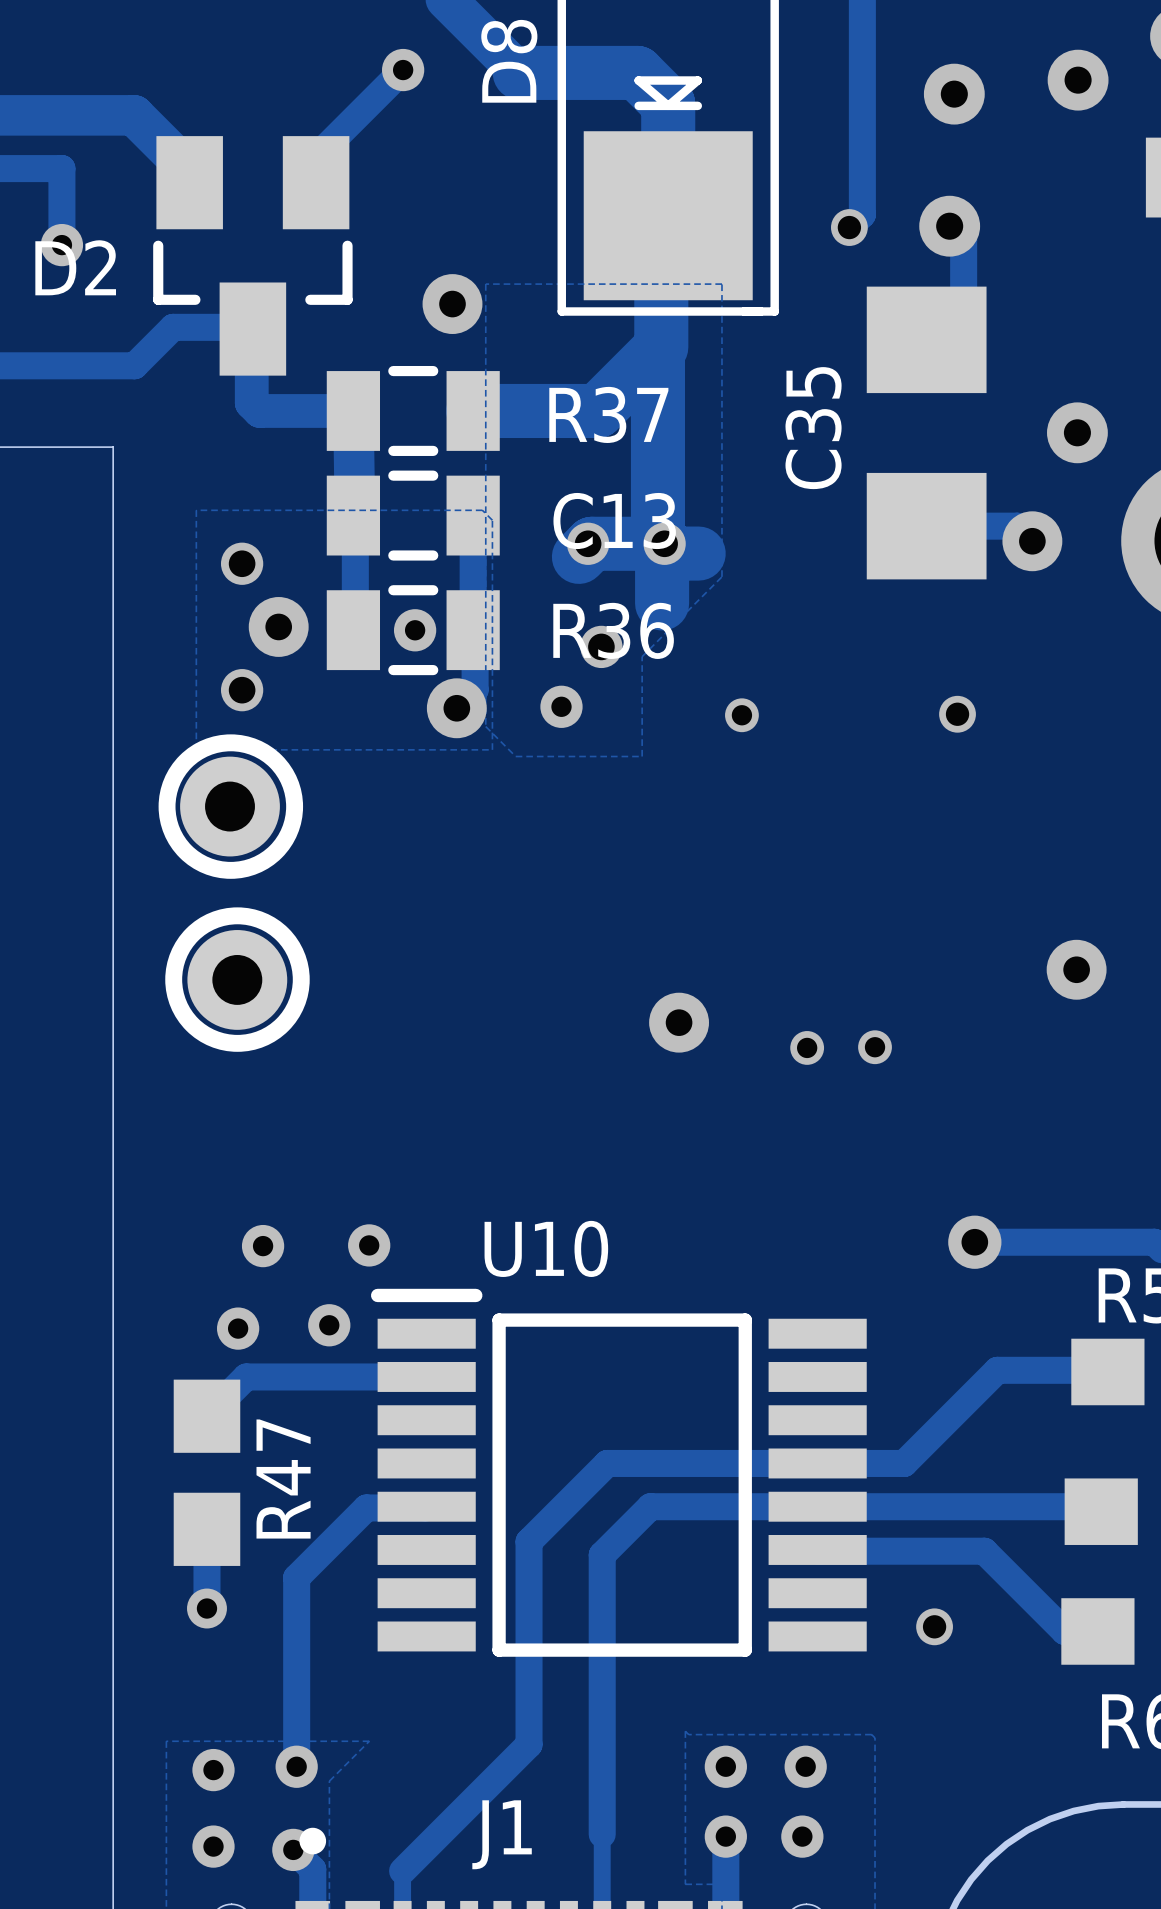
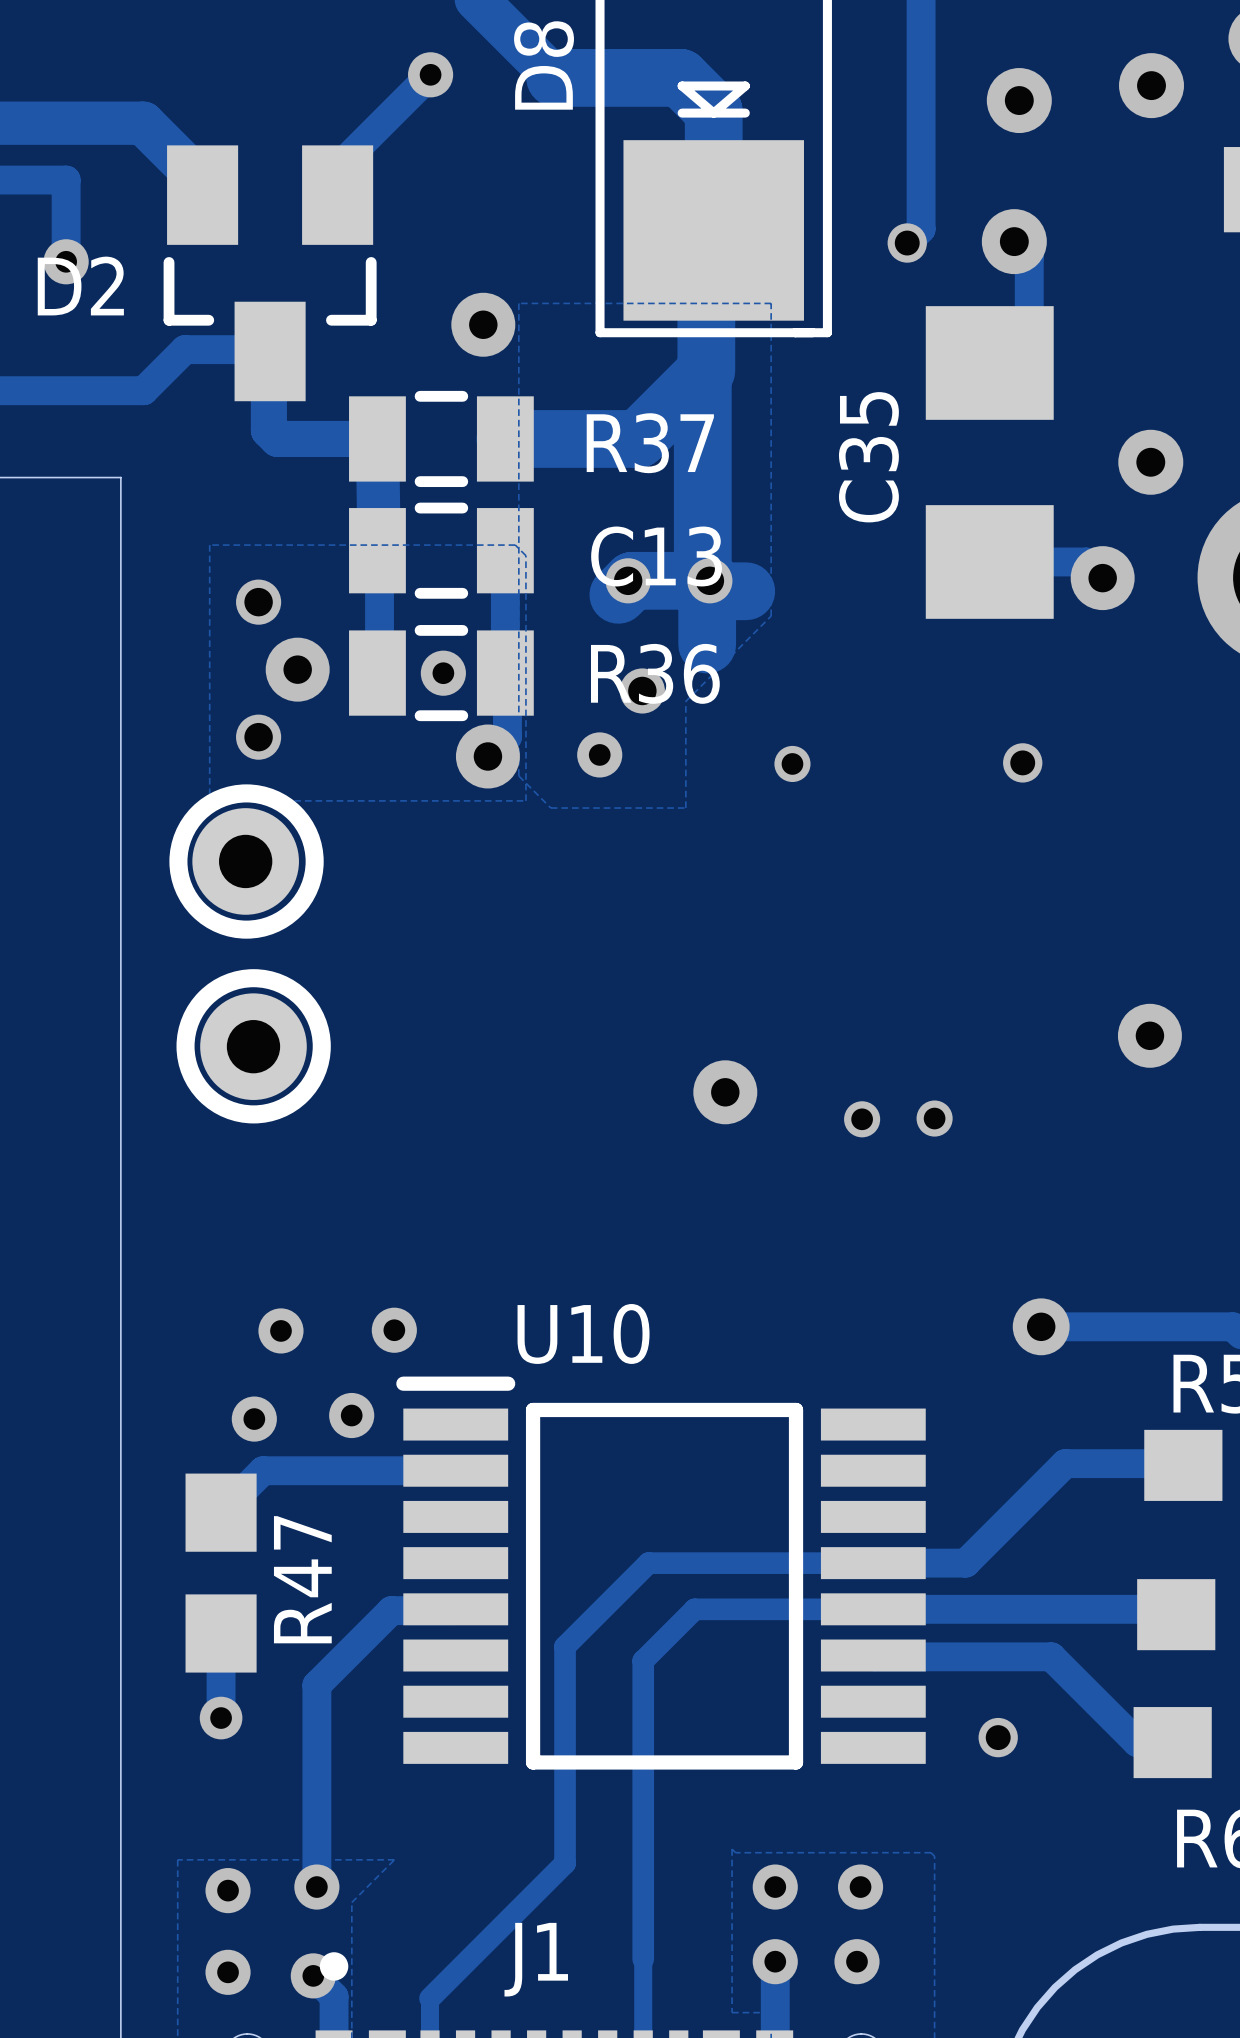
track width: thick (817, 1463) (607, 1463) (529, 1541) (529, 1744) (402, 1871) -> thin (873, 1563) (648, 1563) (565, 1646) (565, 1863) (430, 1998)
track width: thick (817, 1506) (650, 1506) (602, 1554) (602, 1834) -> thin (873, 1609) (694, 1609) (643, 1660) (643, 1959)

